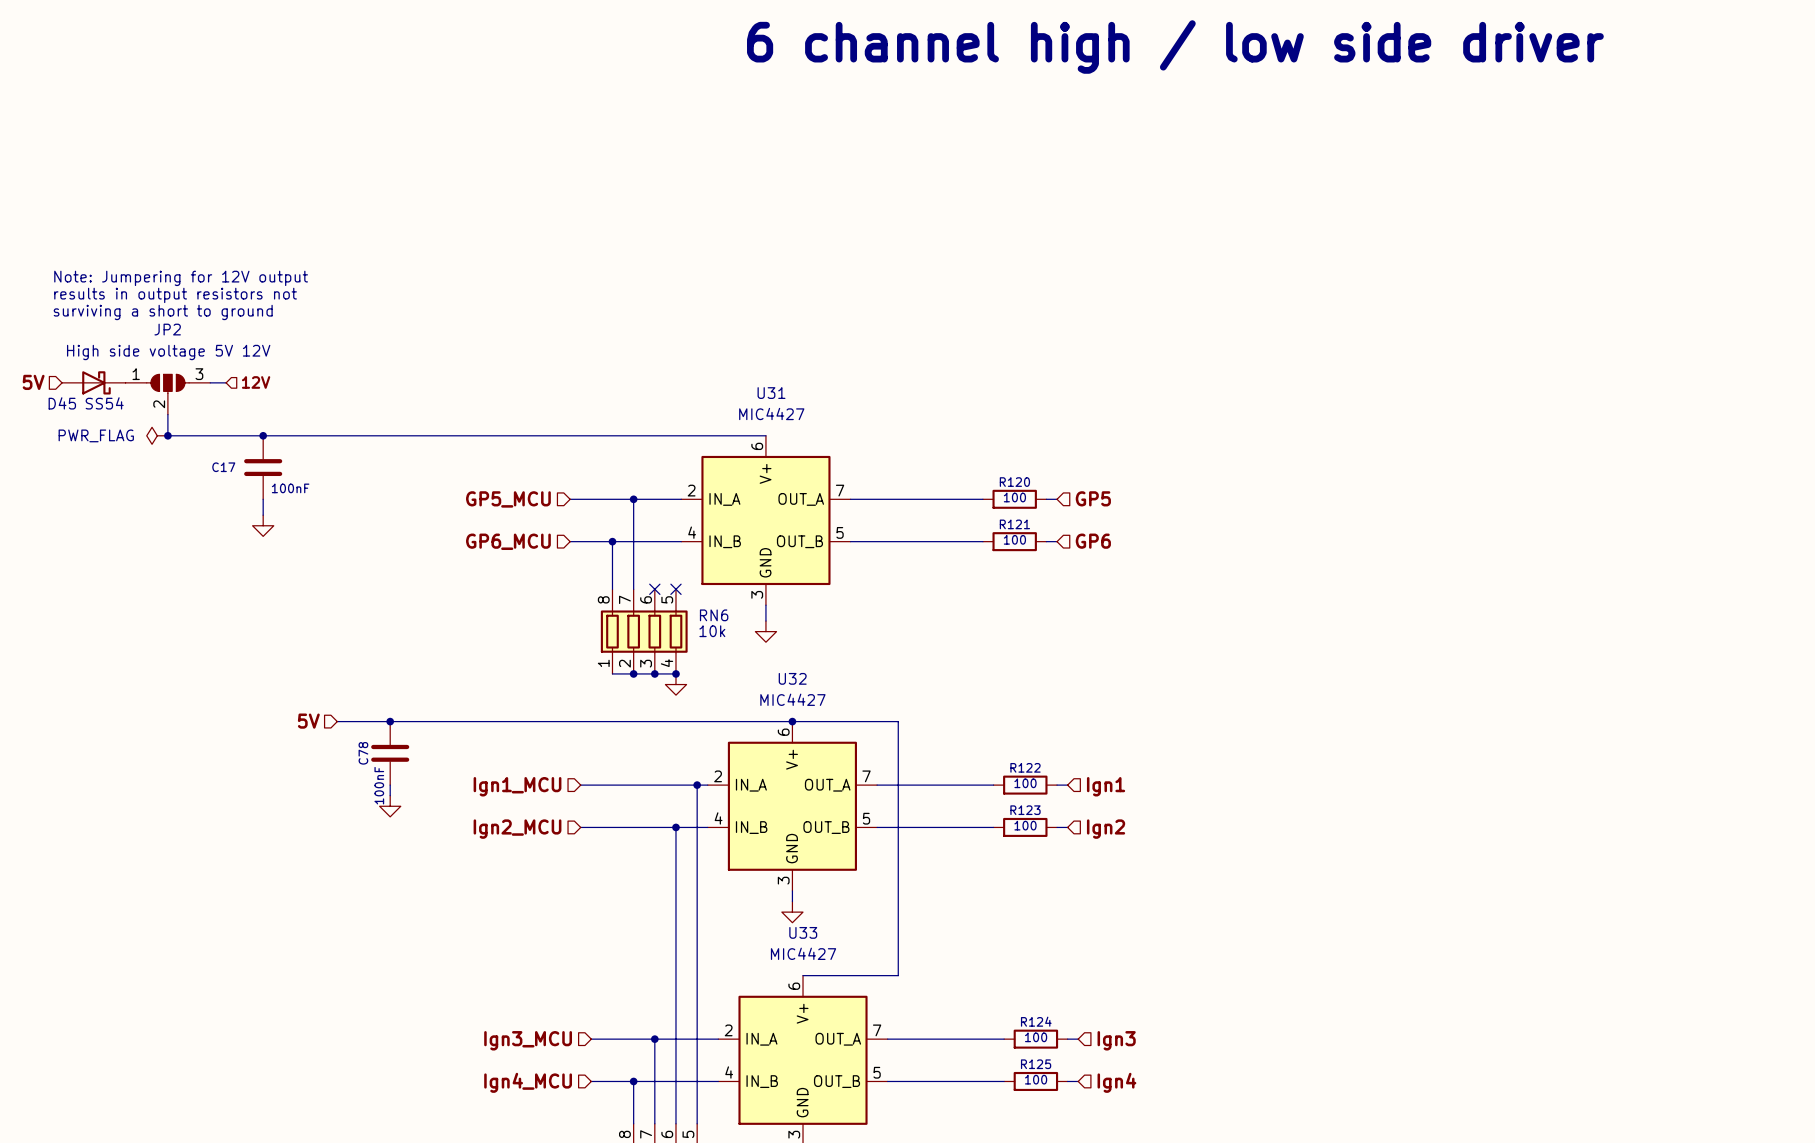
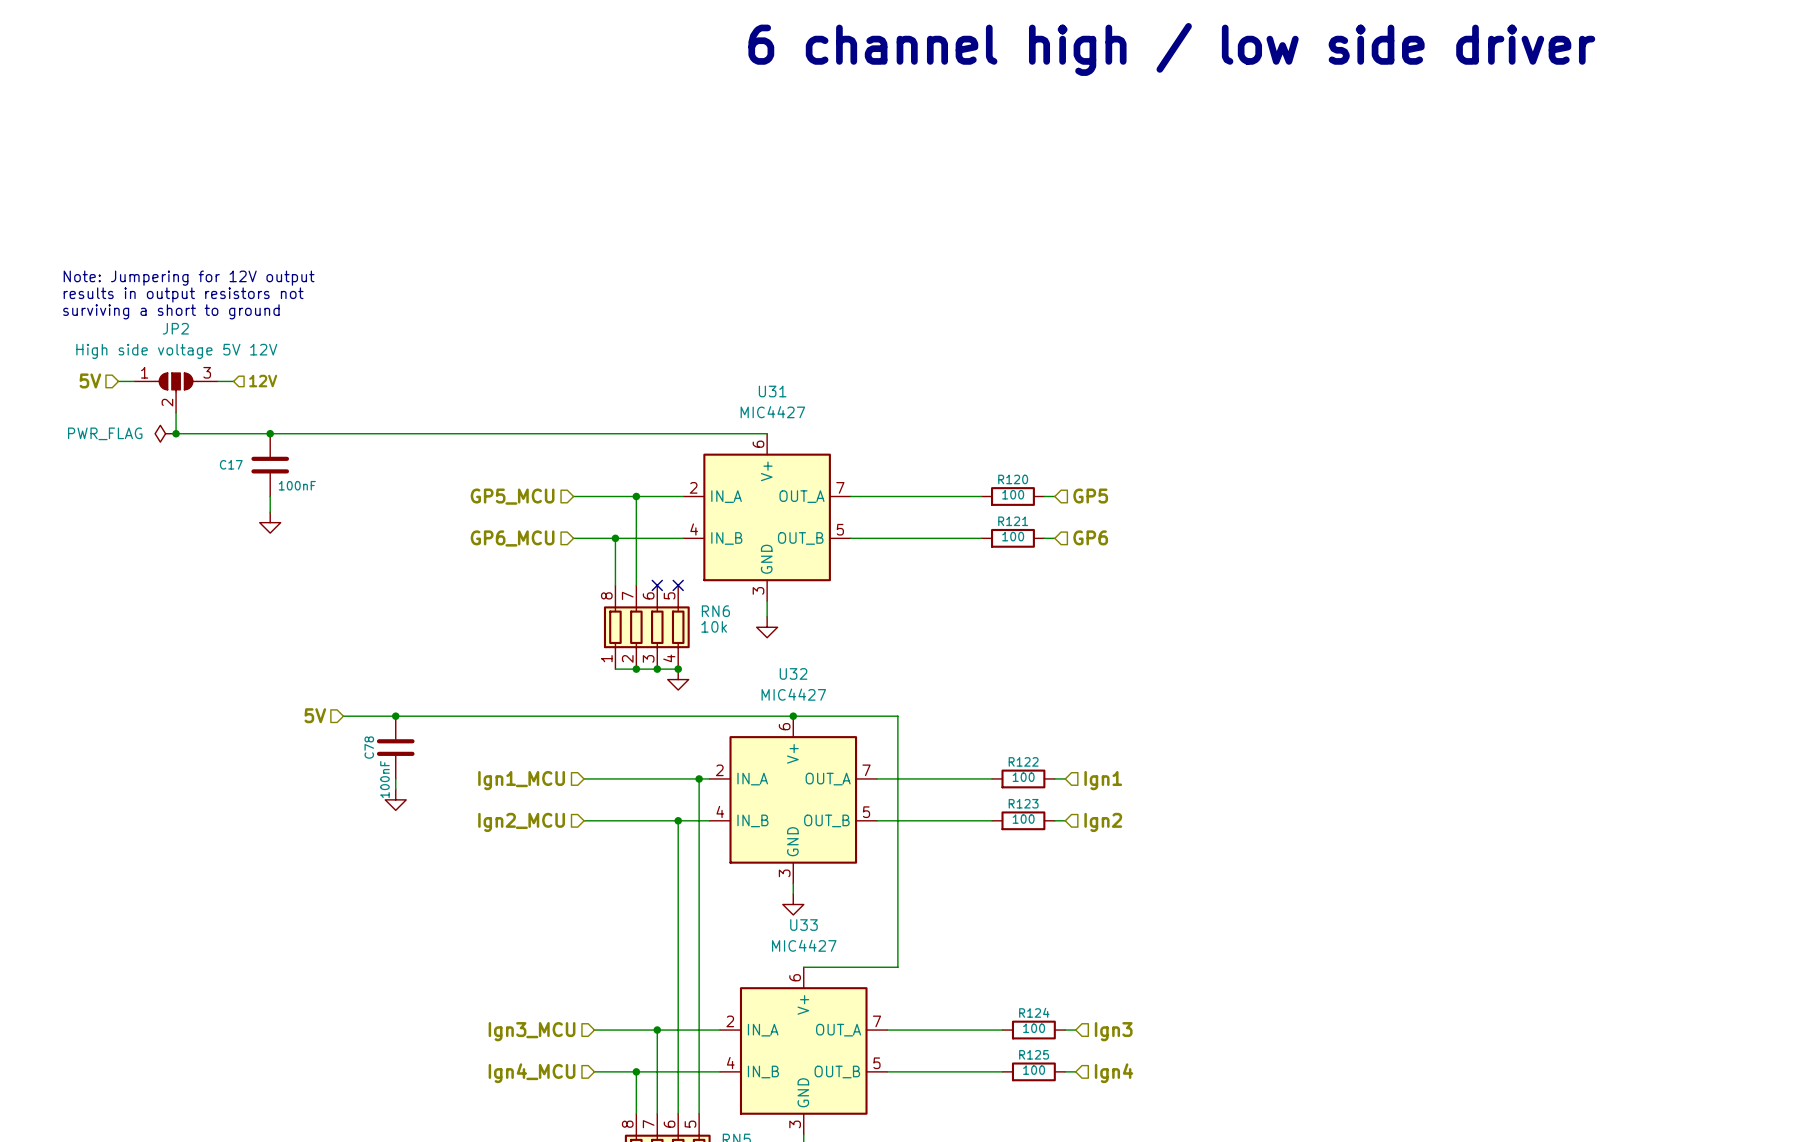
hierarchical label position: 5V (33, 382) -> 5V (90, 380)
D45: SS54 (93, 382) -> none

